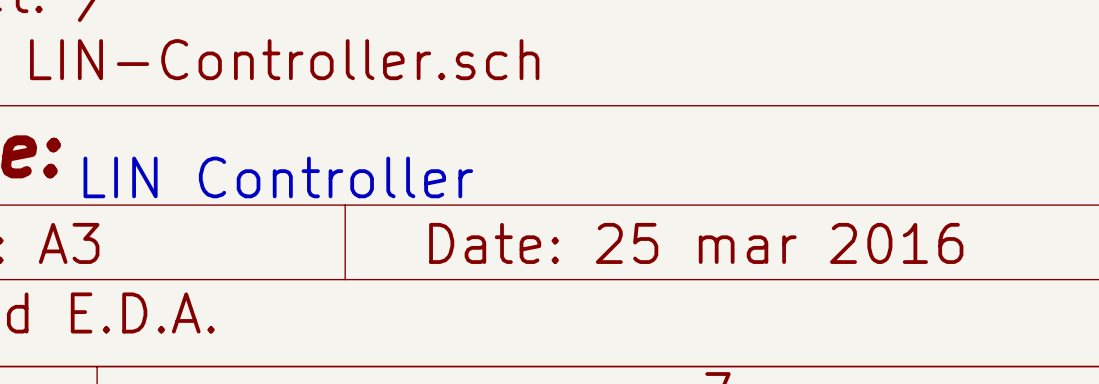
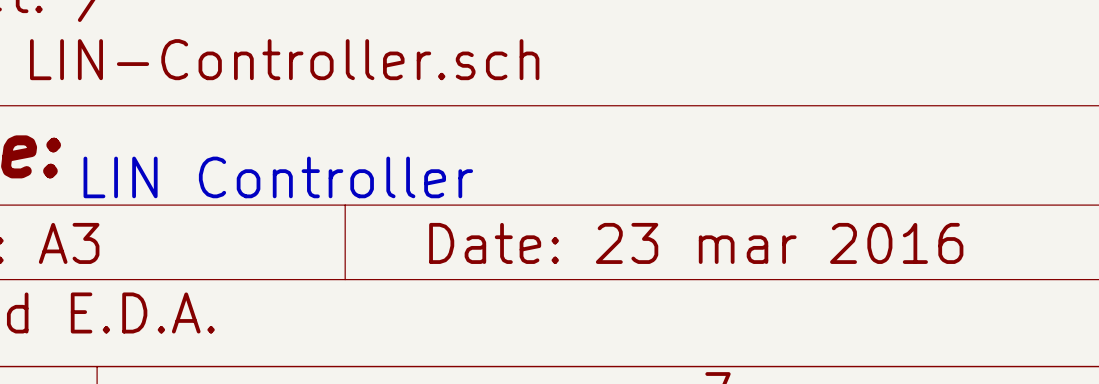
title block: Date: 25 mar 2016 (696, 243) -> Date: 23 mar 2016 (696, 243)

